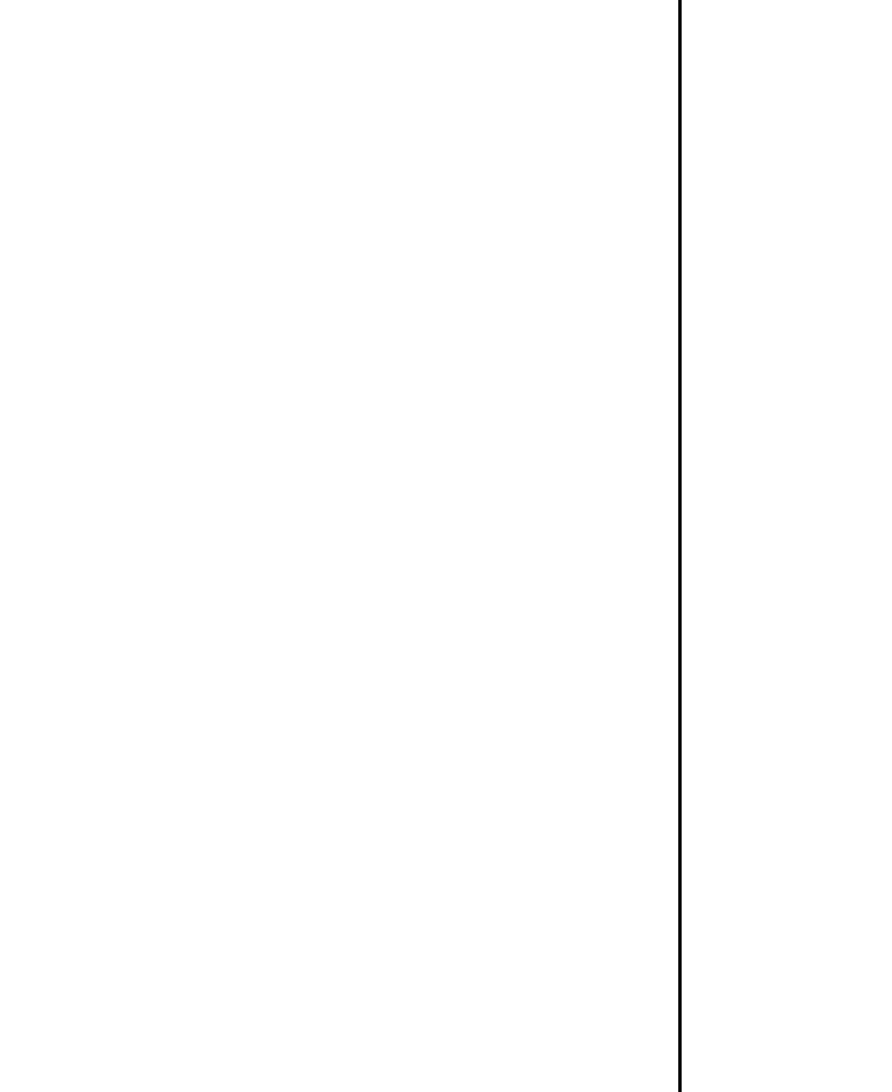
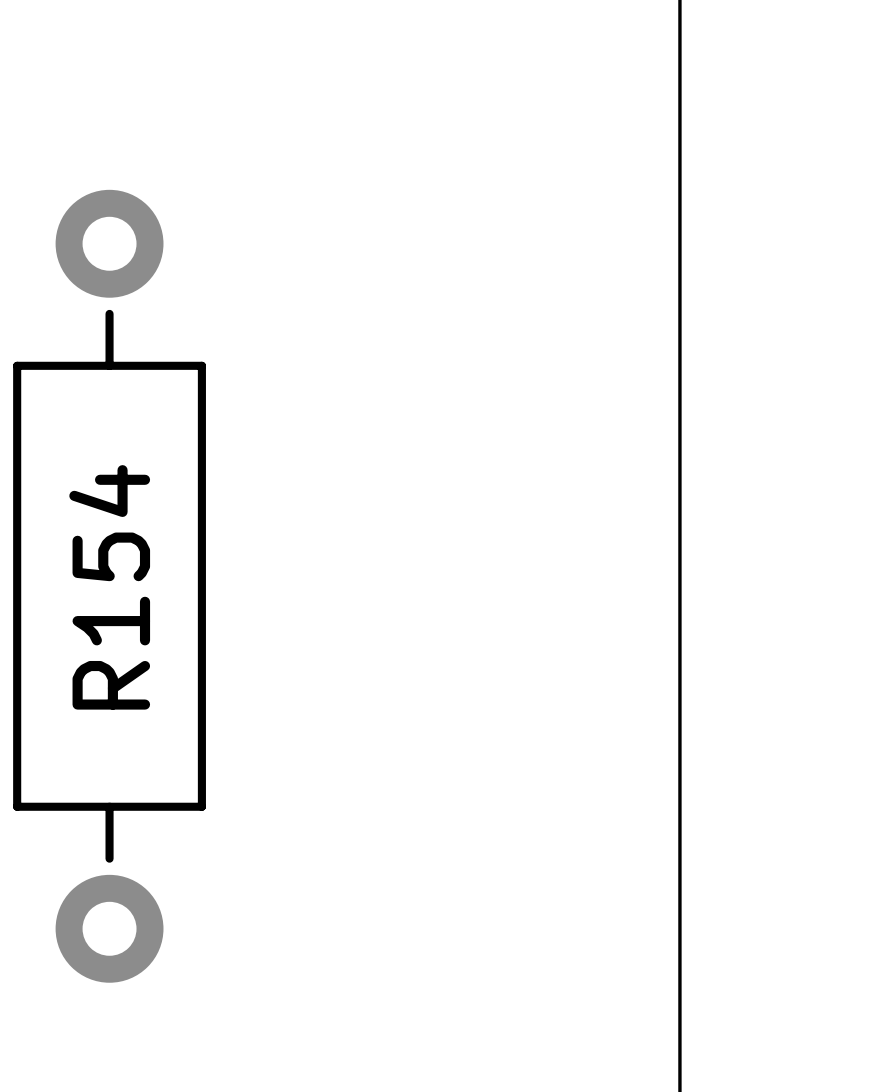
R154: none -> (109, 586)

